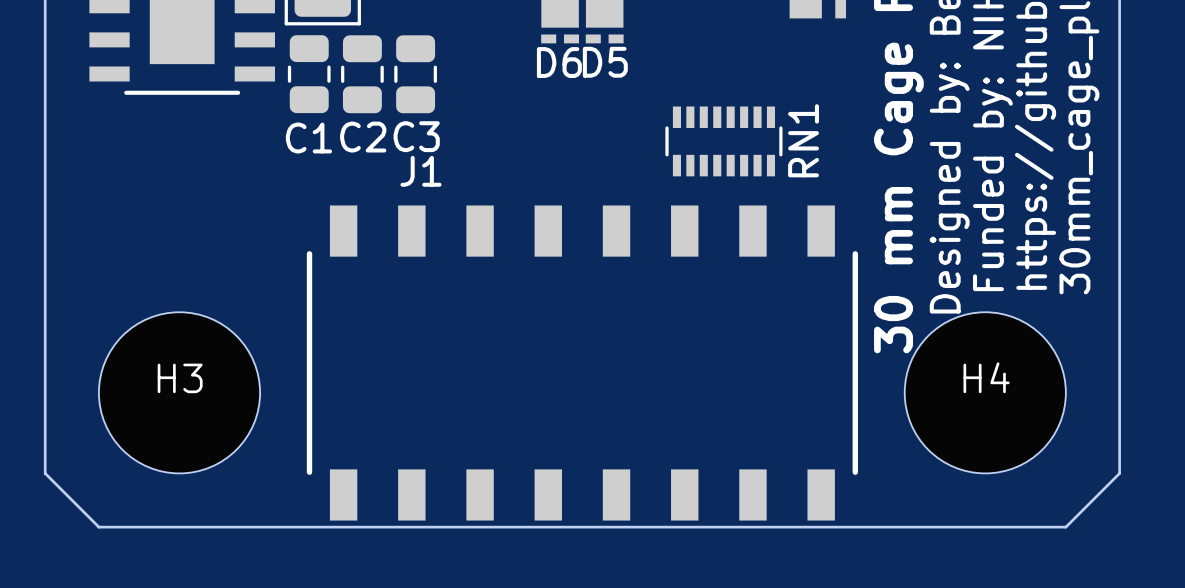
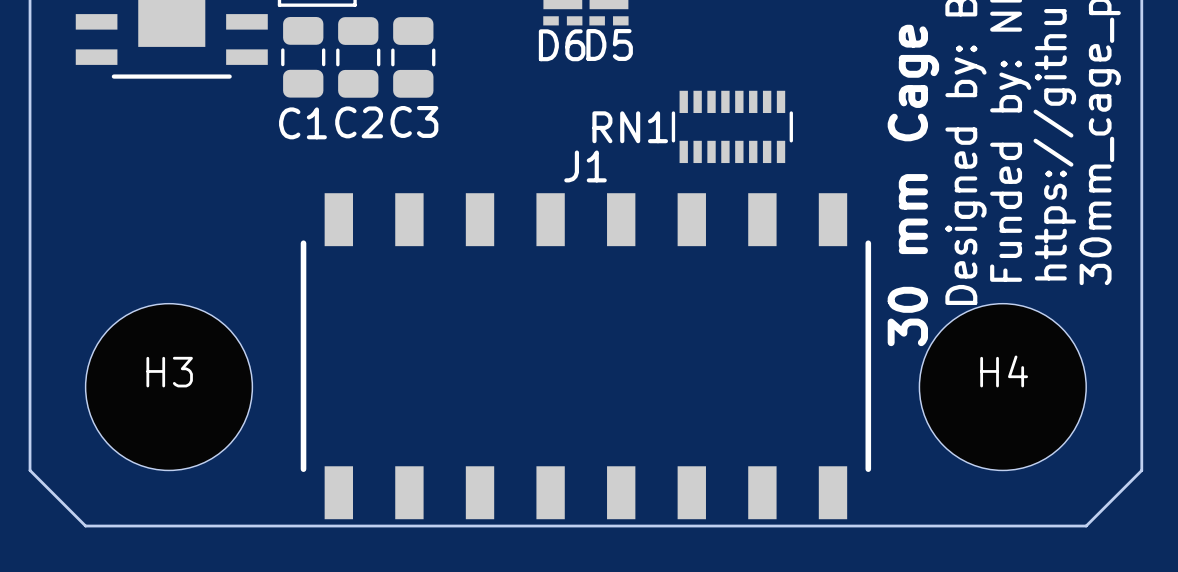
RN1 name rotation: 0° (803, 140) -> 90° clockwise (630, 127)
RN1 name position: RN1 (803, 140) -> RN1 (630, 127)
J1 name position: J1 (421, 171) -> J1 (585, 166)

